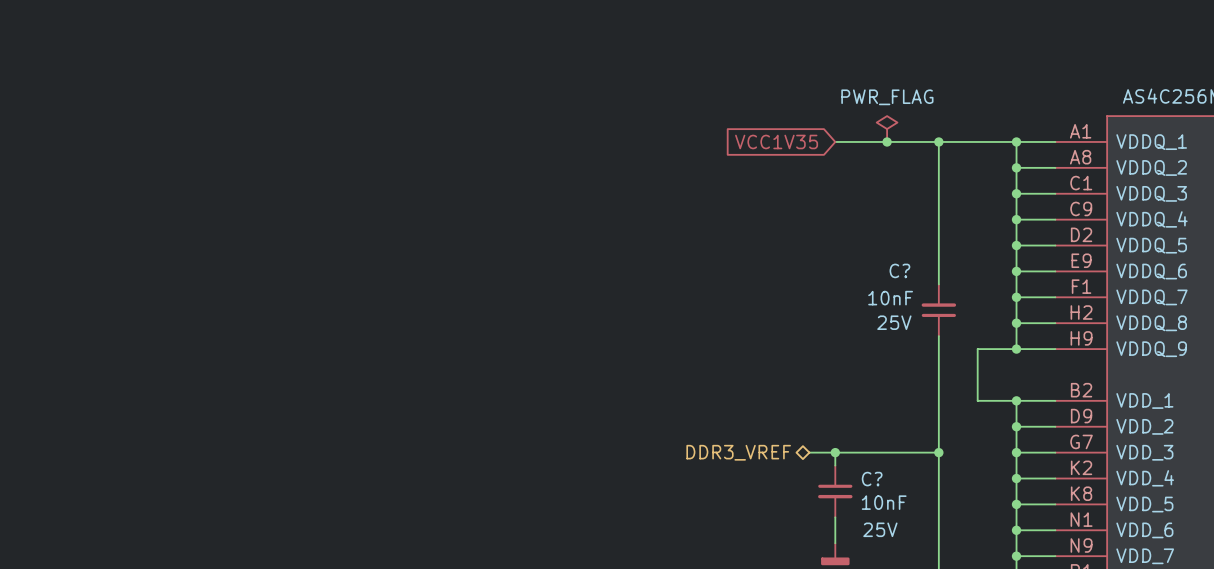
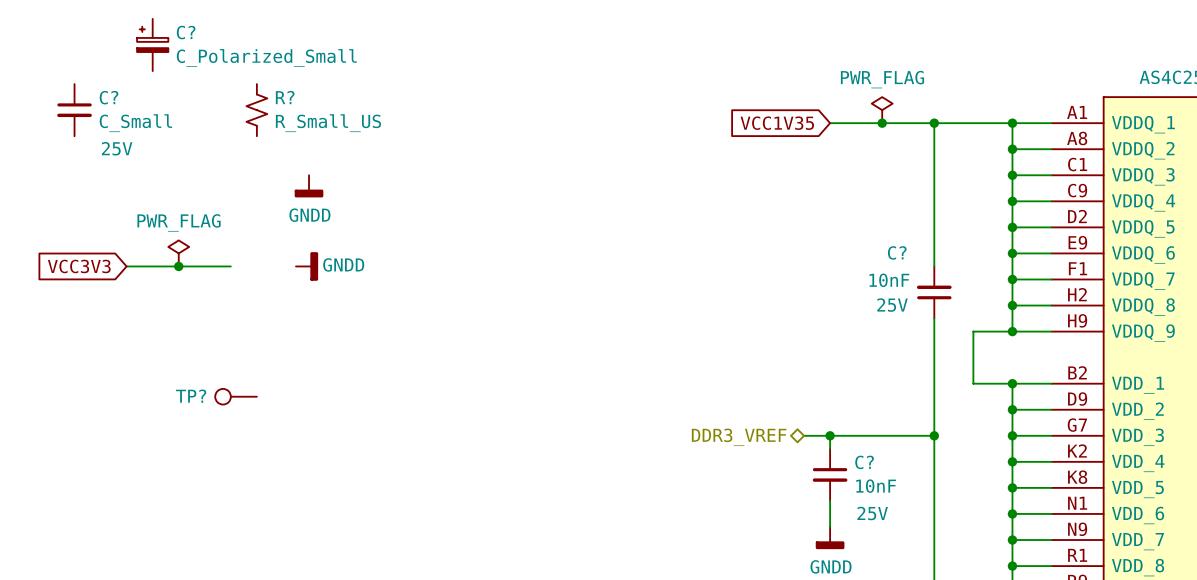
C?: none -> C_Polarized_Small (152, 45)
C?: none -> C_Small (74, 110)
R?: none -> R_Small_US (256, 110)
power symbol: none -> GNDD (309, 186)
power symbol: none -> PWR_FLAG (178, 253)
global label: none -> VCC3V3 (79, 266)
wire: none -> (126, 266) (230, 266)
junction: none -> (178, 266)
power symbol: none -> GNDD (307, 266)
TP?: none -> (236, 396)

